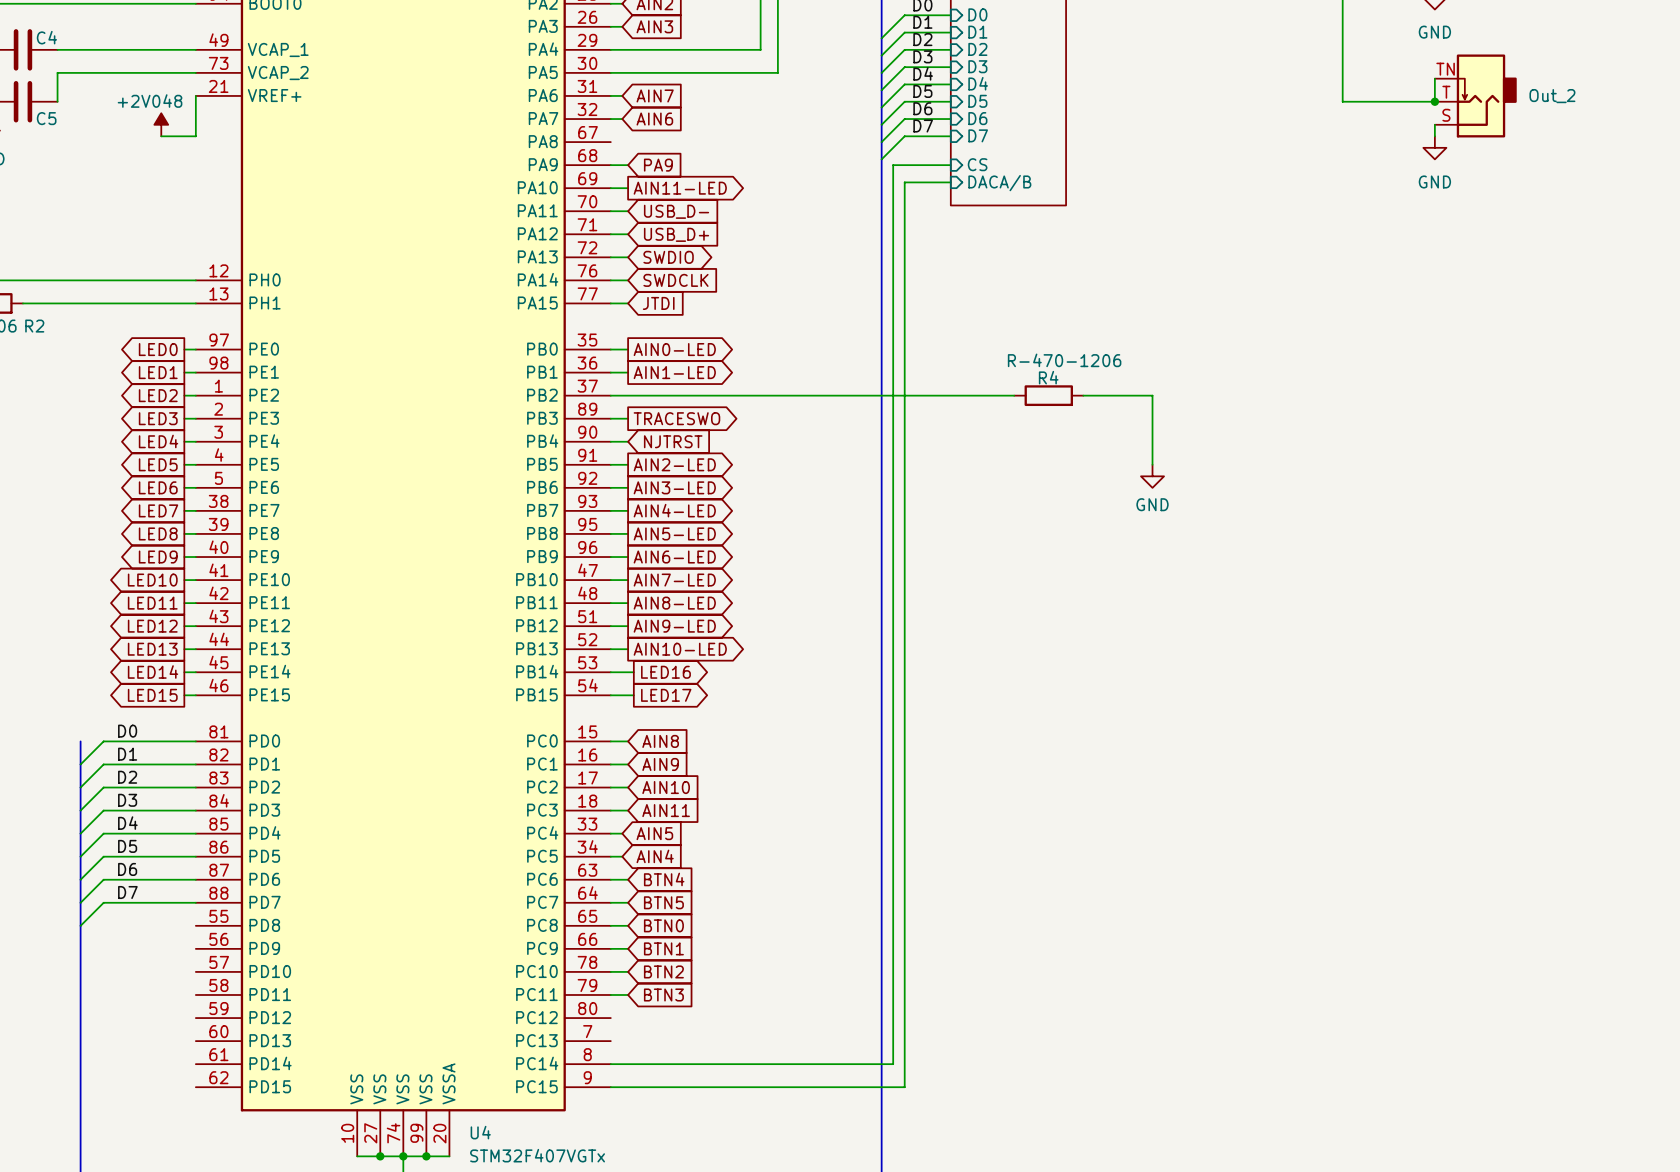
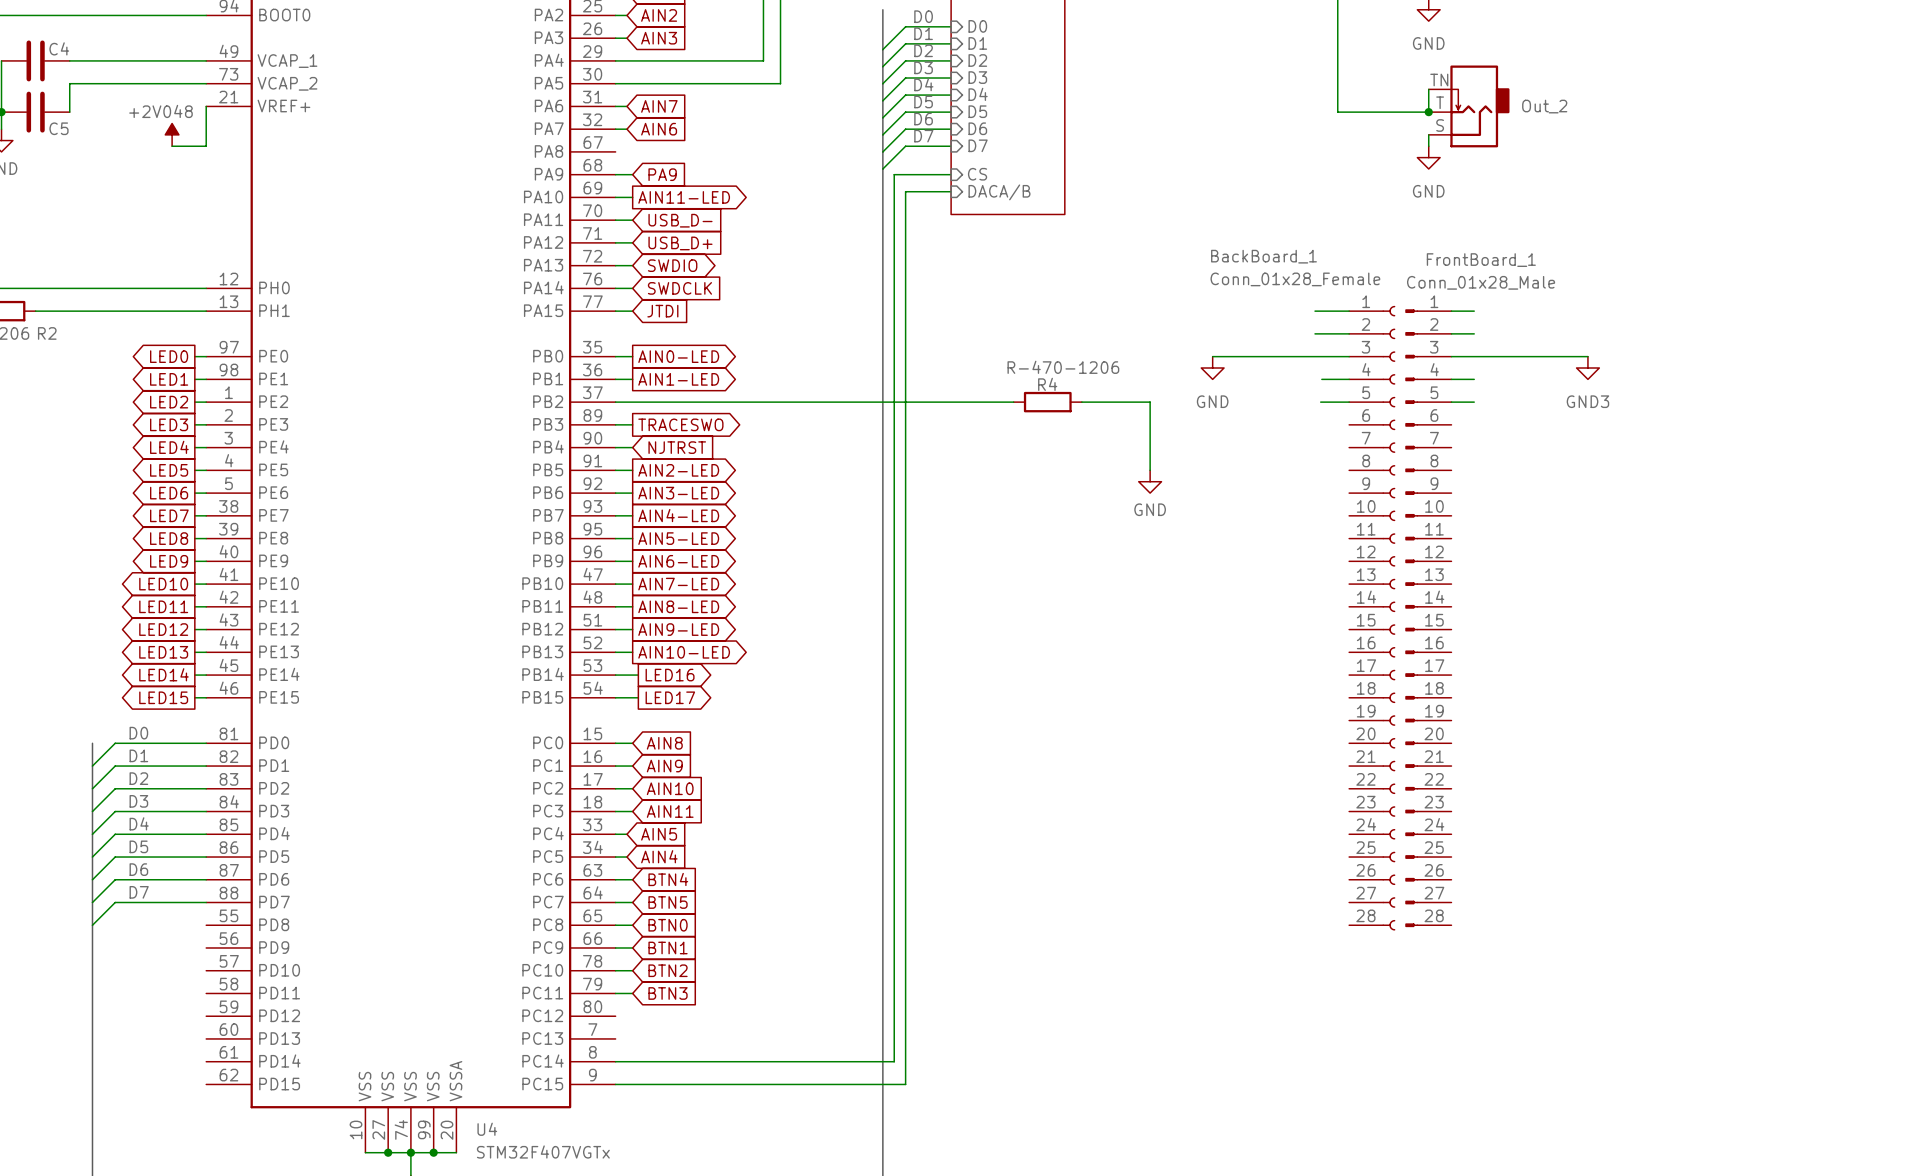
wire: none -> (1315, 311) (1349, 311)
wire: none -> (1451, 311) (1474, 311)
wire: none -> (1315, 333) (1349, 333)
wire: none -> (1451, 333) (1474, 333)
wire: none -> (1212, 356) (1349, 356)
wire: none -> (1451, 356) (1587, 356)
power symbol: none -> GND (1212, 368)
power symbol: none -> GND3 (1587, 368)
wire: none -> (1321, 379) (1349, 379)
wire: none -> (1451, 379) (1474, 379)
wire: none -> (1320, 402) (1349, 402)
wire: none -> (1451, 402) (1474, 402)
BackBoard_1: none -> Conn_01x28_Female (1372, 618)
FrontBoard_1: none -> Conn_01x28_Male (1428, 618)

